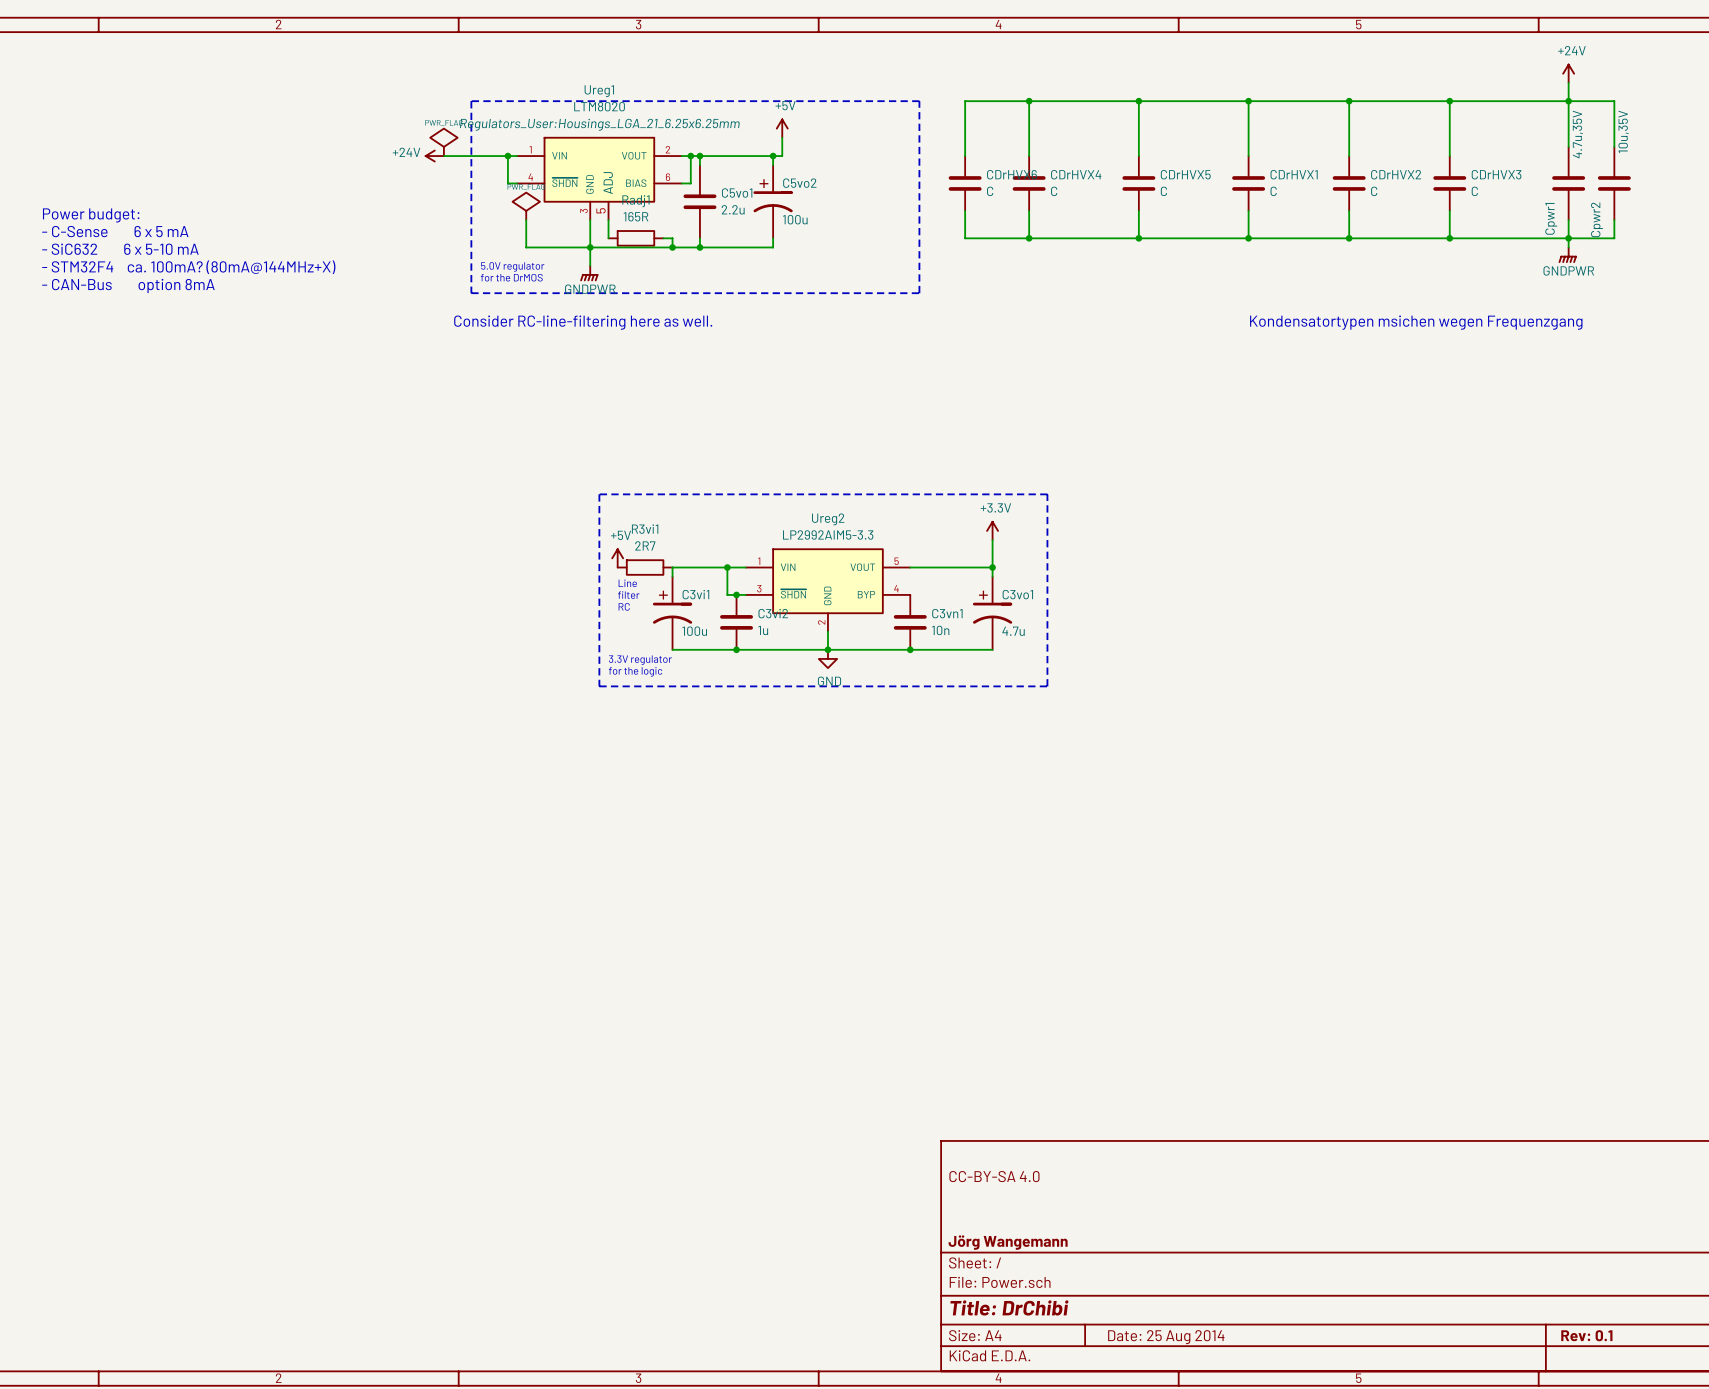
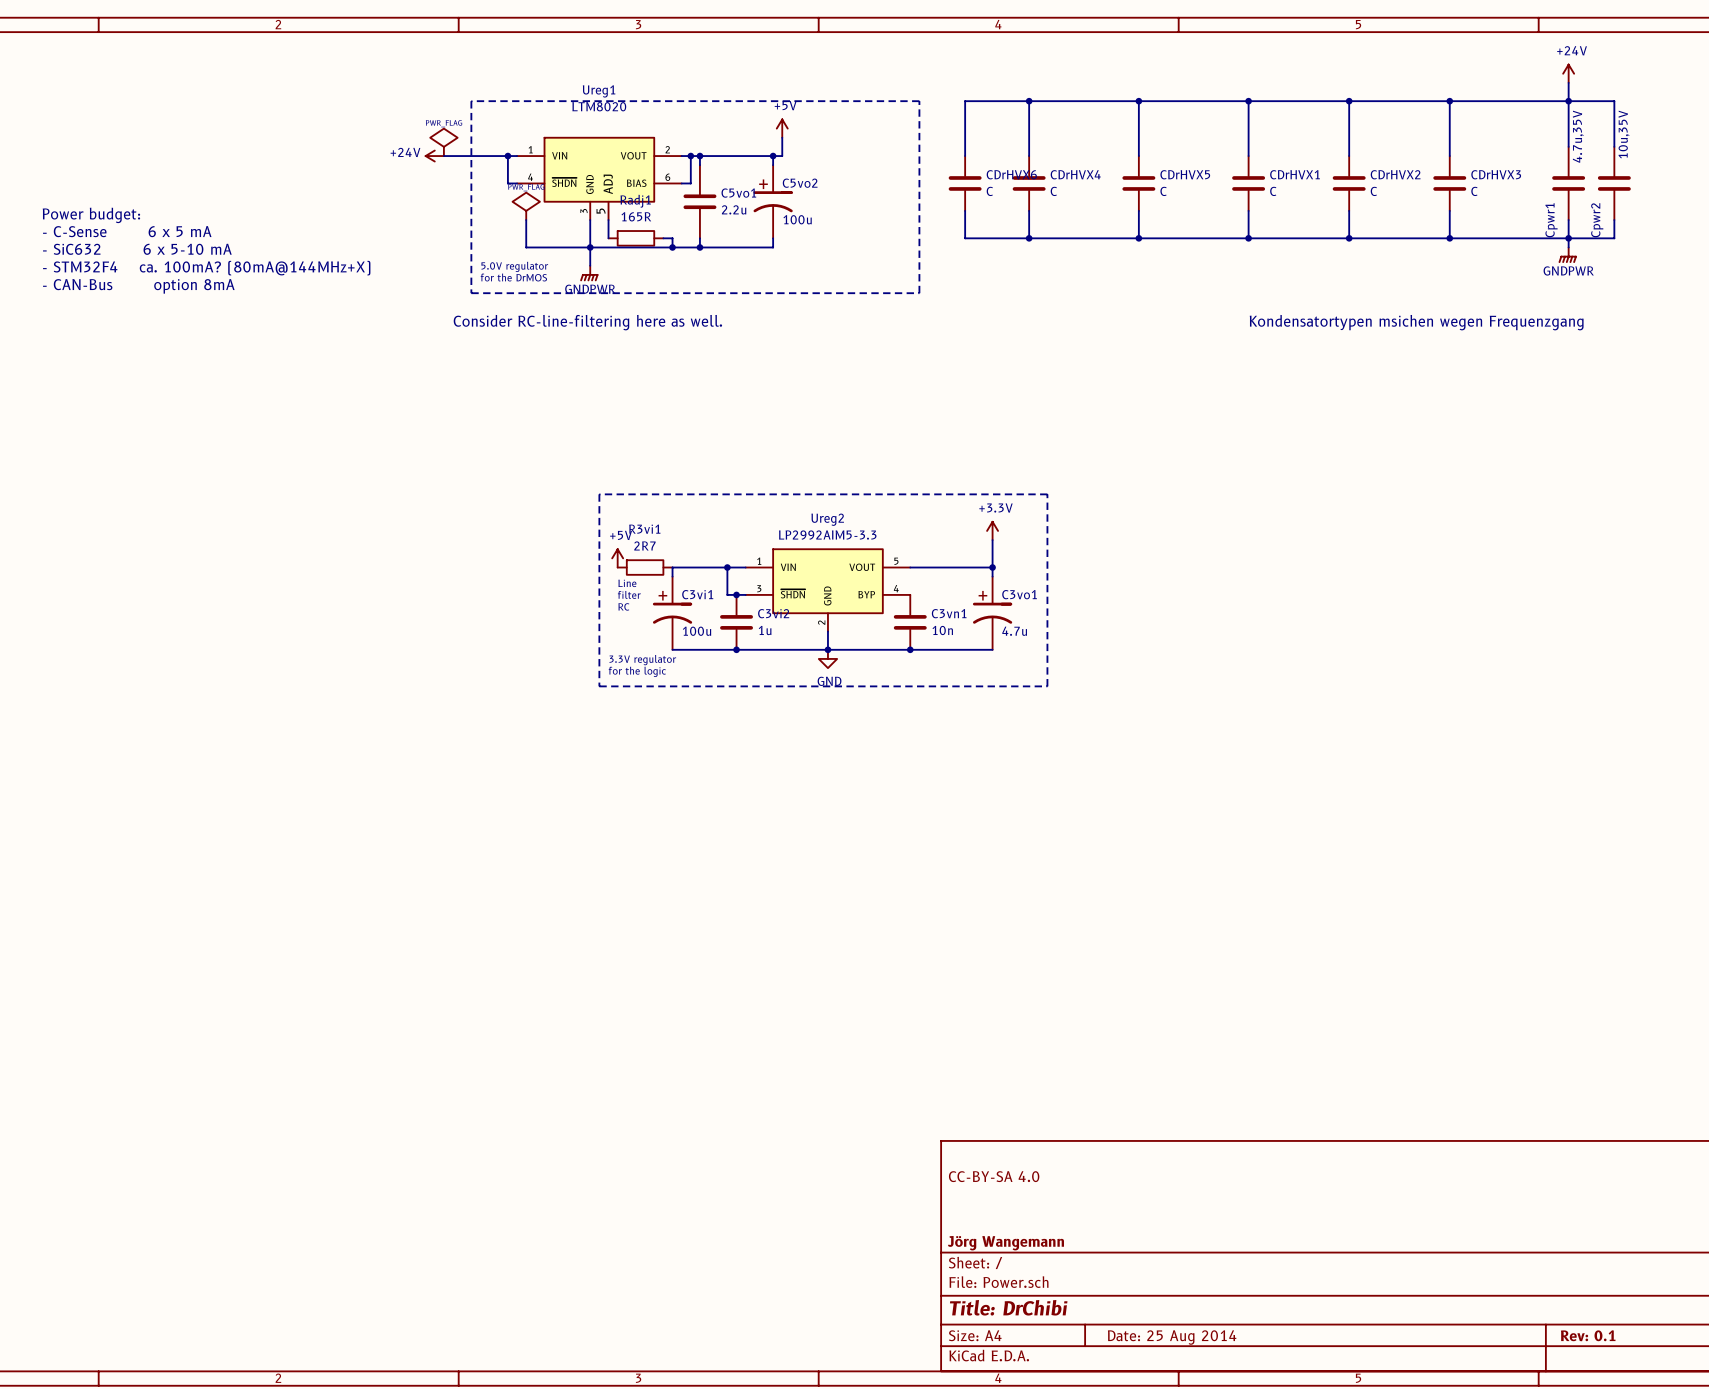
Ureg1 text: Regulators_User:Housings_LGA_21_6.25x6.25mm (599, 124) -> none

